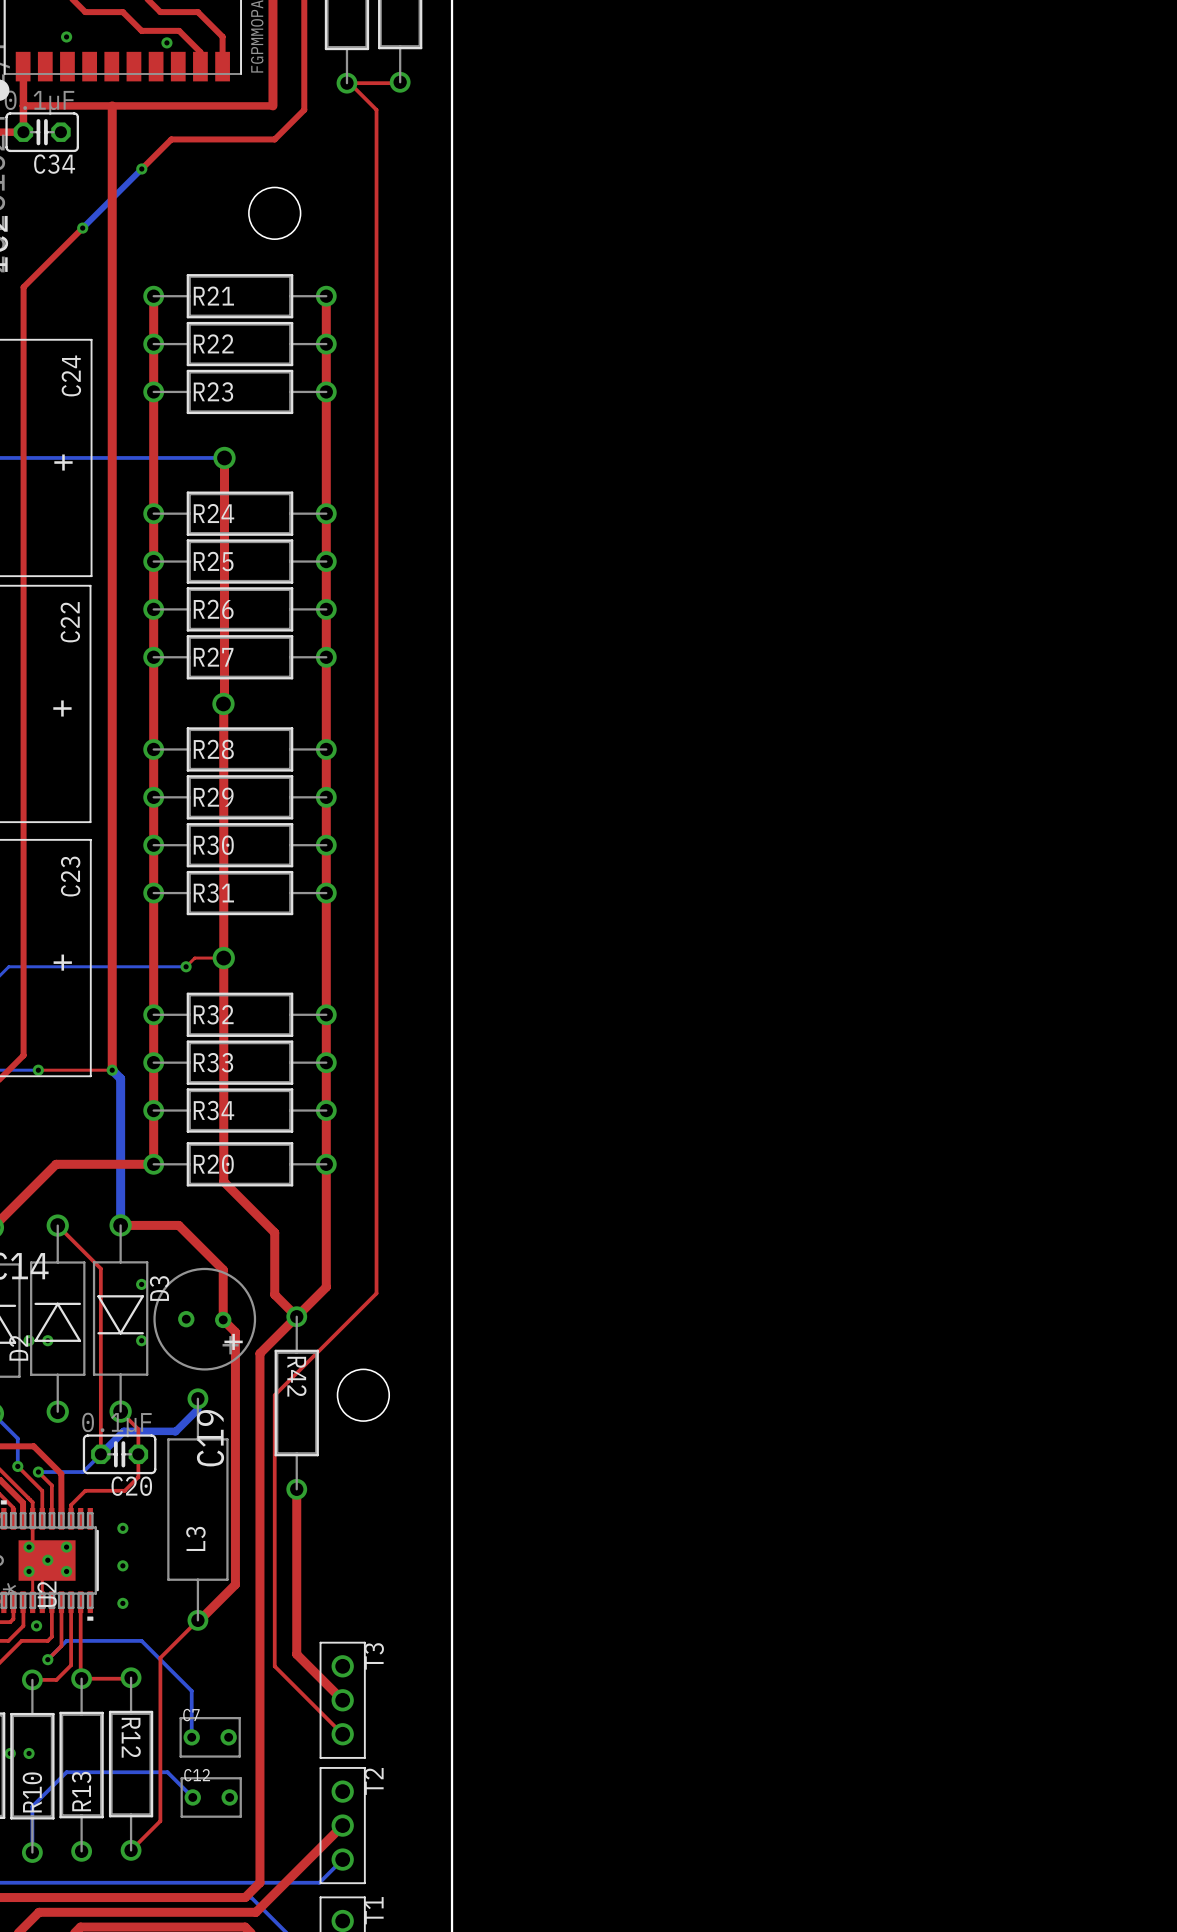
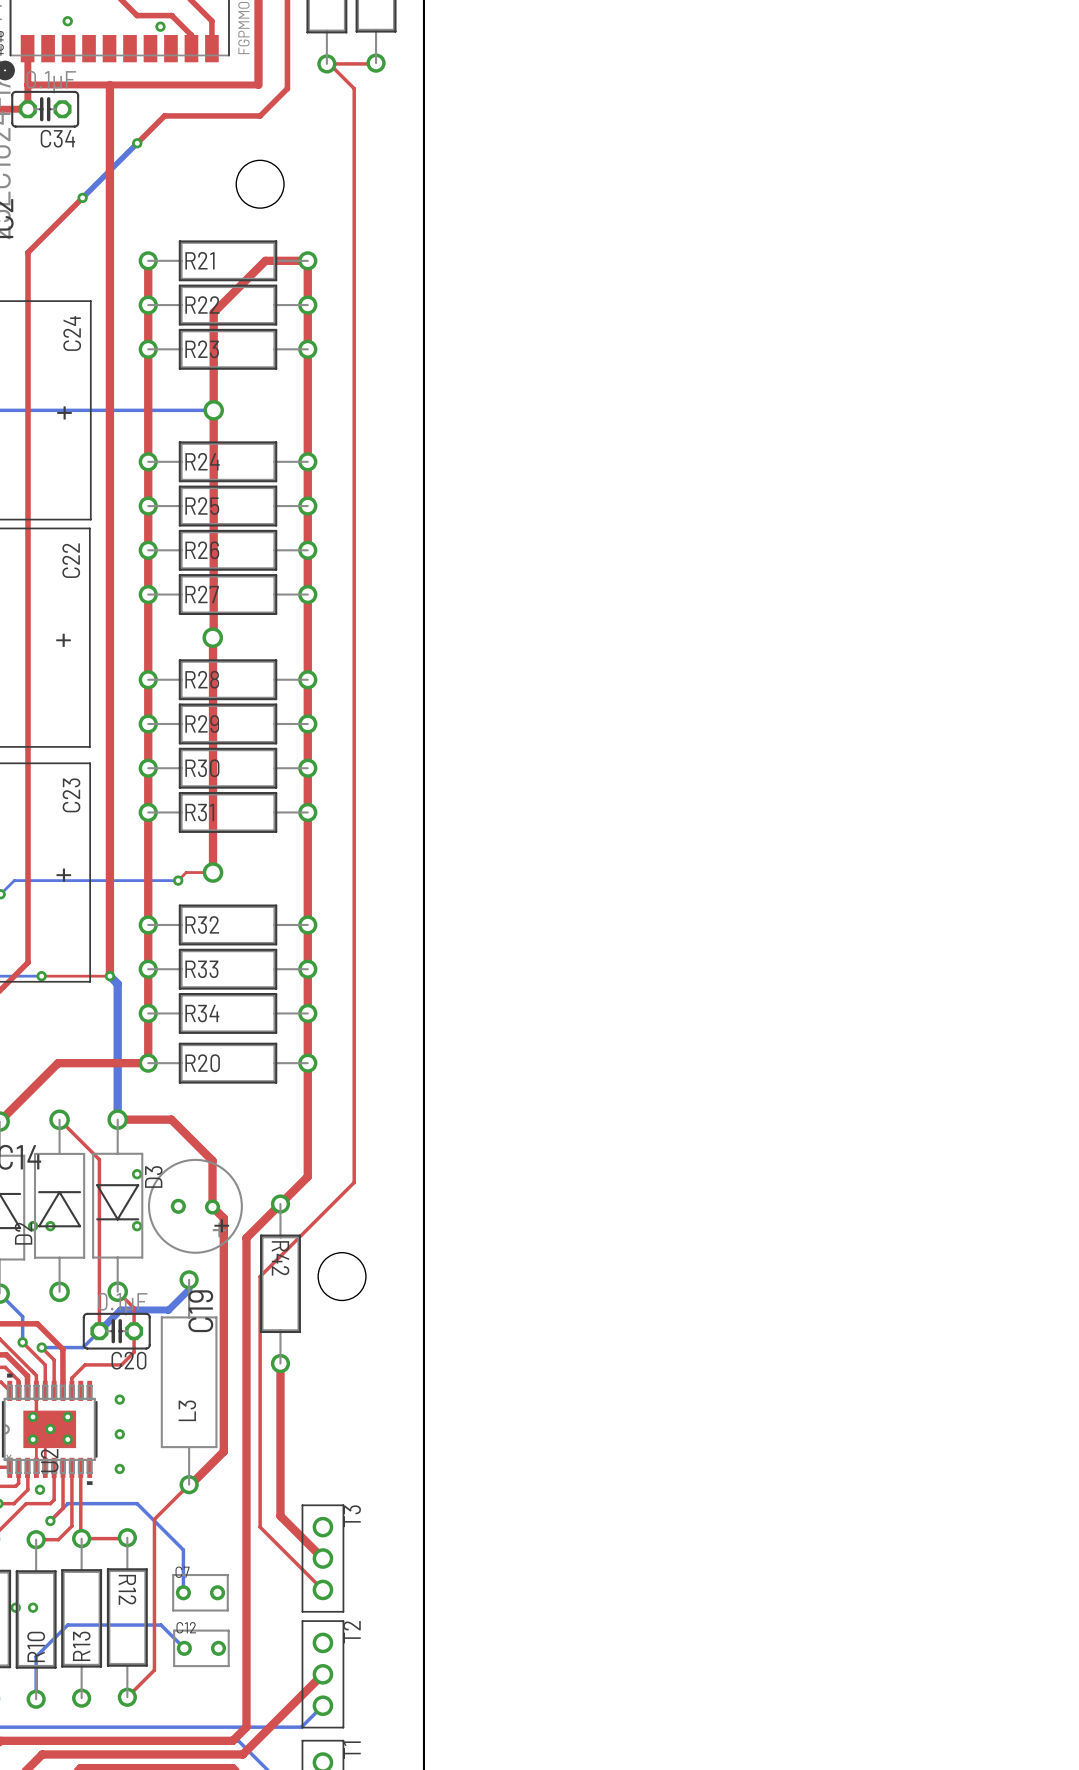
top track: none -> (307, 260) (265, 260) (213, 312) (213, 410)
top track: (223, 958) (223, 1181) (274, 1232) (274, 1294) (296, 1316) -> none

